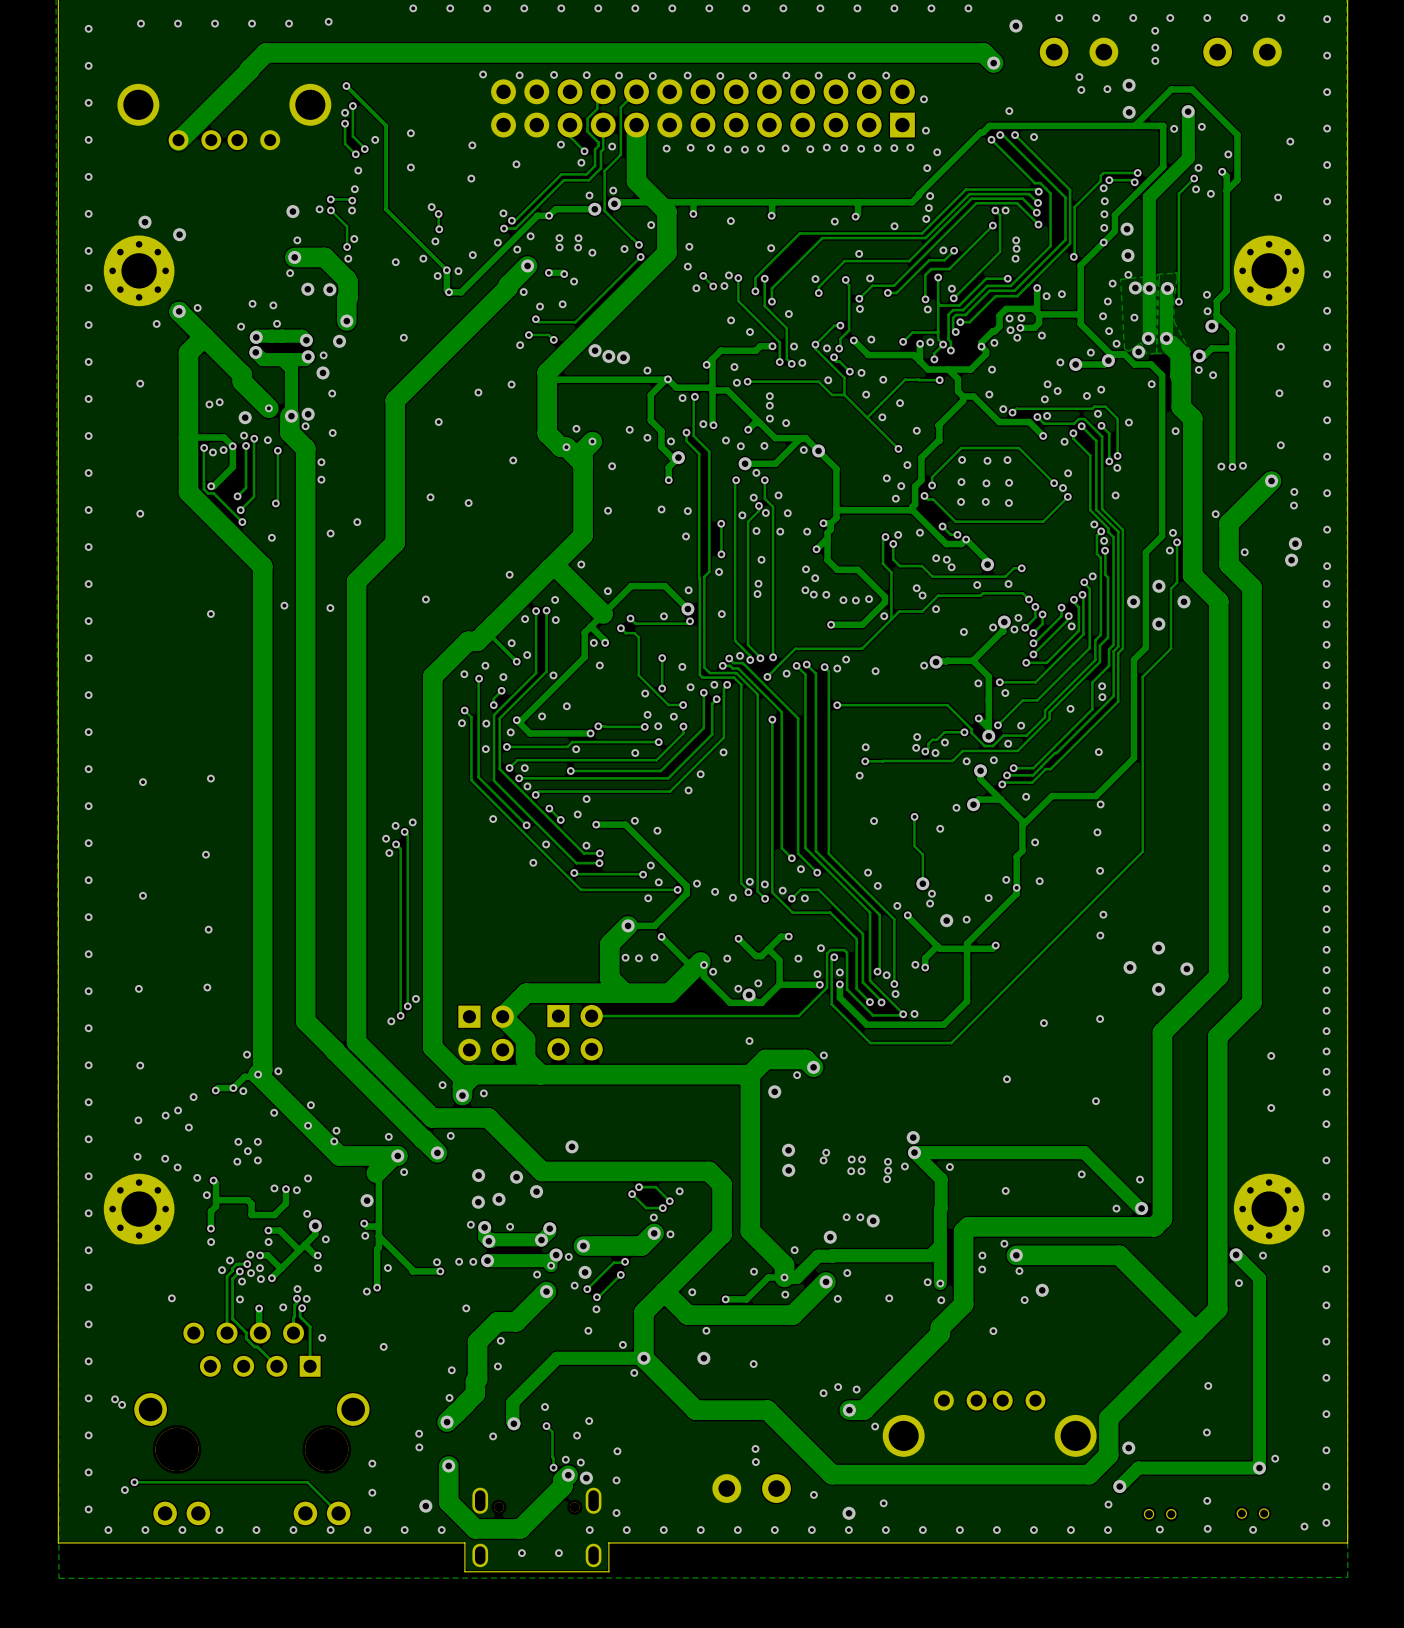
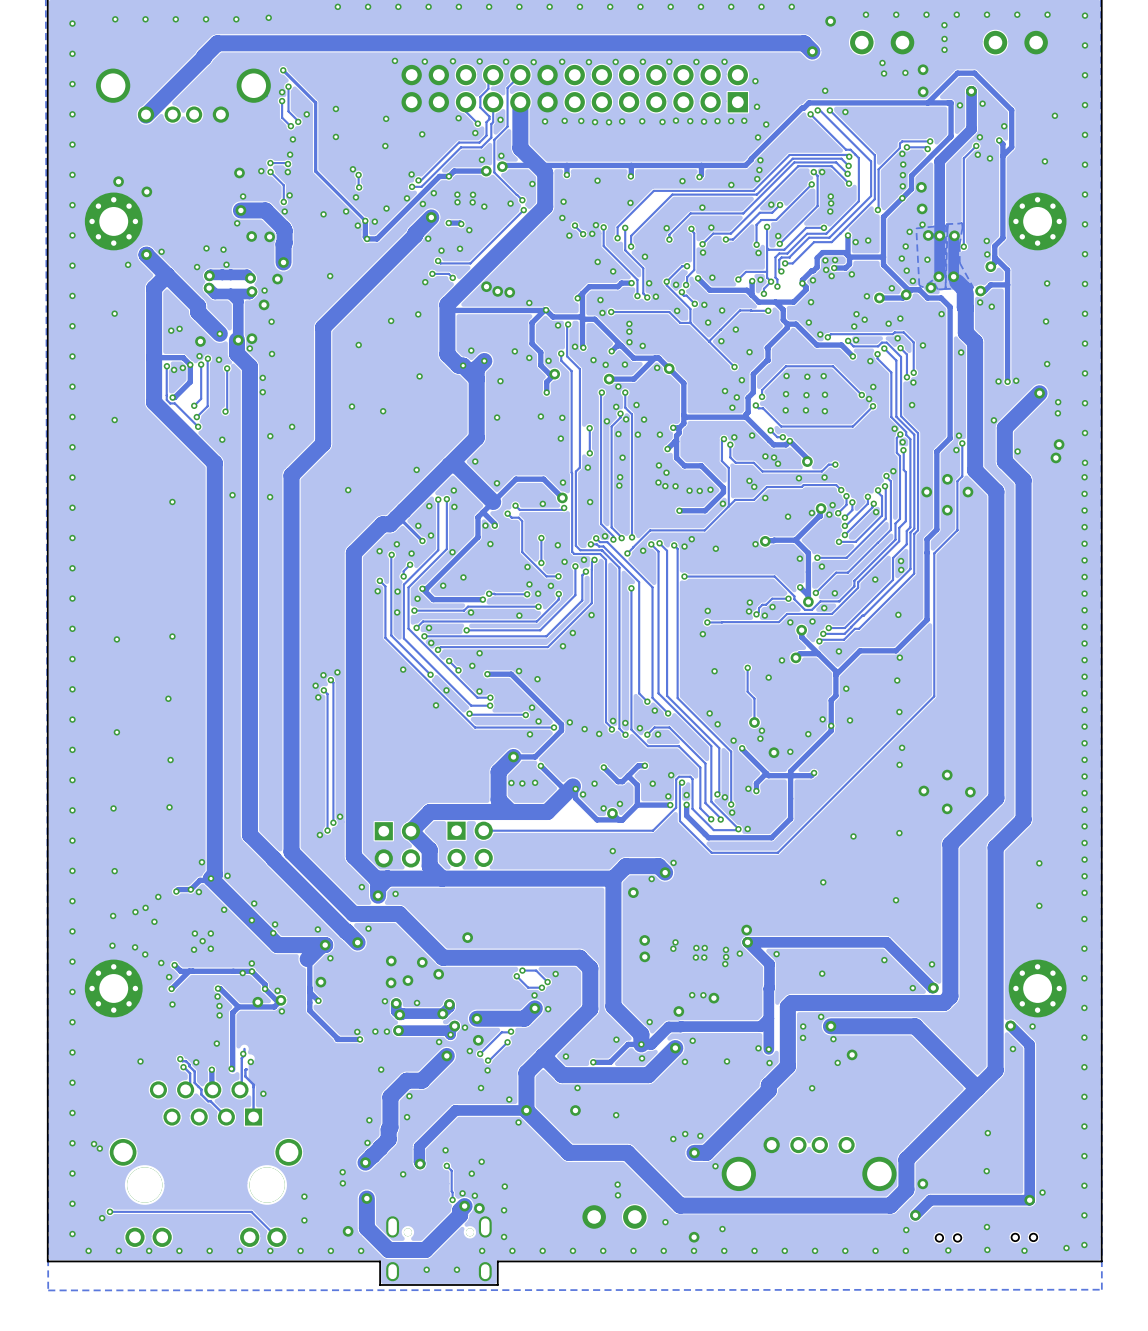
track: (216, 1182) (216, 1206) (210, 1211) (210, 1228) -> (176, 967) (180, 971) (251, 971) (265, 984) (265, 988) (276, 1000) (280, 1000) (274, 1006) (238, 1006)
track: none -> (189, 971) (171, 988)
via: (274, 1188) -> none
via: none -> (252, 971)
track: (285, 1189) (285, 1203) (274, 1215) (251, 1215) (251, 1203) (247, 1200) (216, 1200) -> none
via: (285, 1189) -> none
via: (367, 1200) -> none
via: none -> (320, 982)
via: none -> (171, 988)
track: none -> (217, 988) (238, 1006)
via: none -> (217, 988)
via: none -> (265, 988)
via: none -> (277, 990)
via: (307, 1213) -> none
track: none -> (309, 992) (318, 1000)
via: none -> (217, 996)
via: none -> (280, 1000)
track: (364, 1223) (367, 1226) (378, 1226) -> none
via: (364, 1223) -> none
via: none -> (318, 1000)
track: (315, 1225) (315, 1234) (271, 1278) -> none
track: (268, 1230) (279, 1230) (299, 1250) -> none
track: none -> (238, 1006) (232, 1012) (232, 1069)
via: (365, 1235) -> none
track: (378, 1236) (377, 1287) -> none
via: none -> (281, 1011)
via: (325, 1239) -> none
via: (211, 1242) -> none
track: (304, 1244) (317, 1255) -> none
via: (250, 1254) -> none
track: (260, 1255) (267, 1255) (281, 1268) -> none
via: (260, 1255) -> none
via: (317, 1255) -> none
via: (229, 1260) -> none
track: (247, 1264) (236, 1264) (227, 1276) (227, 1333) -> (183, 1067) (190, 1073) (190, 1085) (185, 1089)
via: (247, 1264) -> none
via: (260, 1268) -> none
via: (317, 1268) -> none
via: (387, 1268) -> none
via: (222, 1270) -> none
via: (239, 1271) -> none
track: (240, 1272) (232, 1278) (232, 1319) -> none
via: (251, 1273) -> none
via: none -> (216, 1043)
via: (271, 1278) -> none
via: (260, 1279) -> none
via: (242, 1281) -> none
via: (377, 1287) -> none
via: (366, 1291) -> none
via: none -> (180, 1059)
track: (296, 1298) (294, 1306) (293, 1333) -> (244, 1048) (244, 1055) (241, 1058) (241, 1088) (239, 1089)
via: (296, 1298) -> none
via: none -> (183, 1067)
via: (302, 1308) -> none
track: (232, 1319) (238, 1324) -> (180, 1059) (185, 1061) (194, 1071) (194, 1082)
via: (383, 1346) -> none

